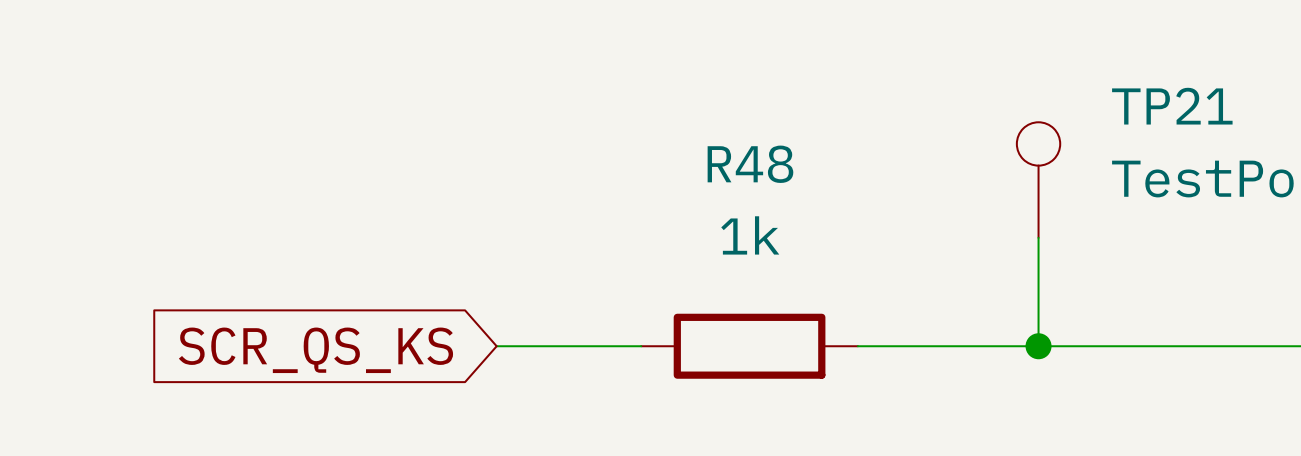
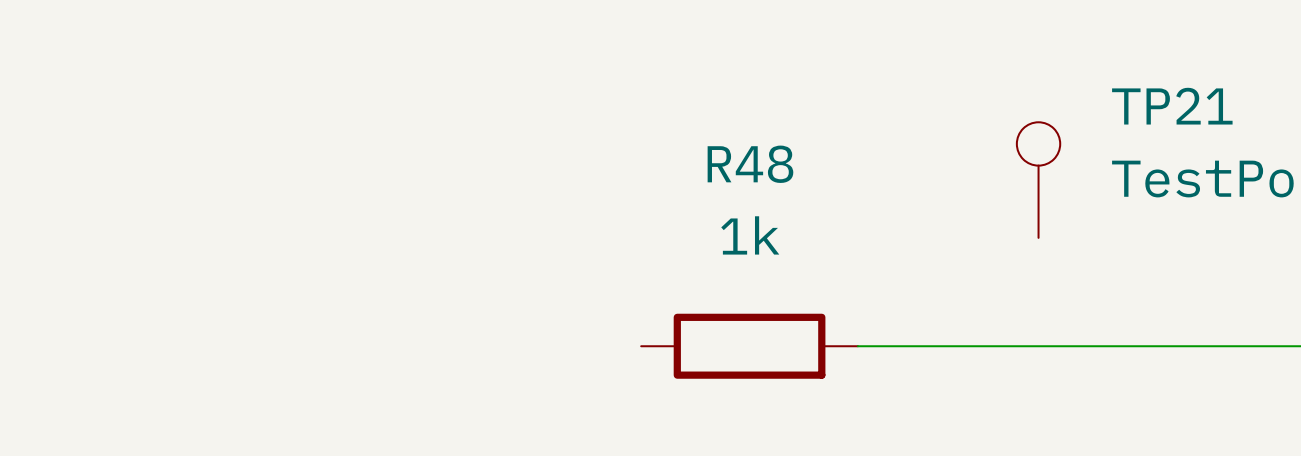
wire: (1038, 237) (1038, 346) -> none
wire: (496, 346) (641, 346) -> none
junction: (1038, 346) -> none
global label: SCR_QS_KS (315, 350) -> none

